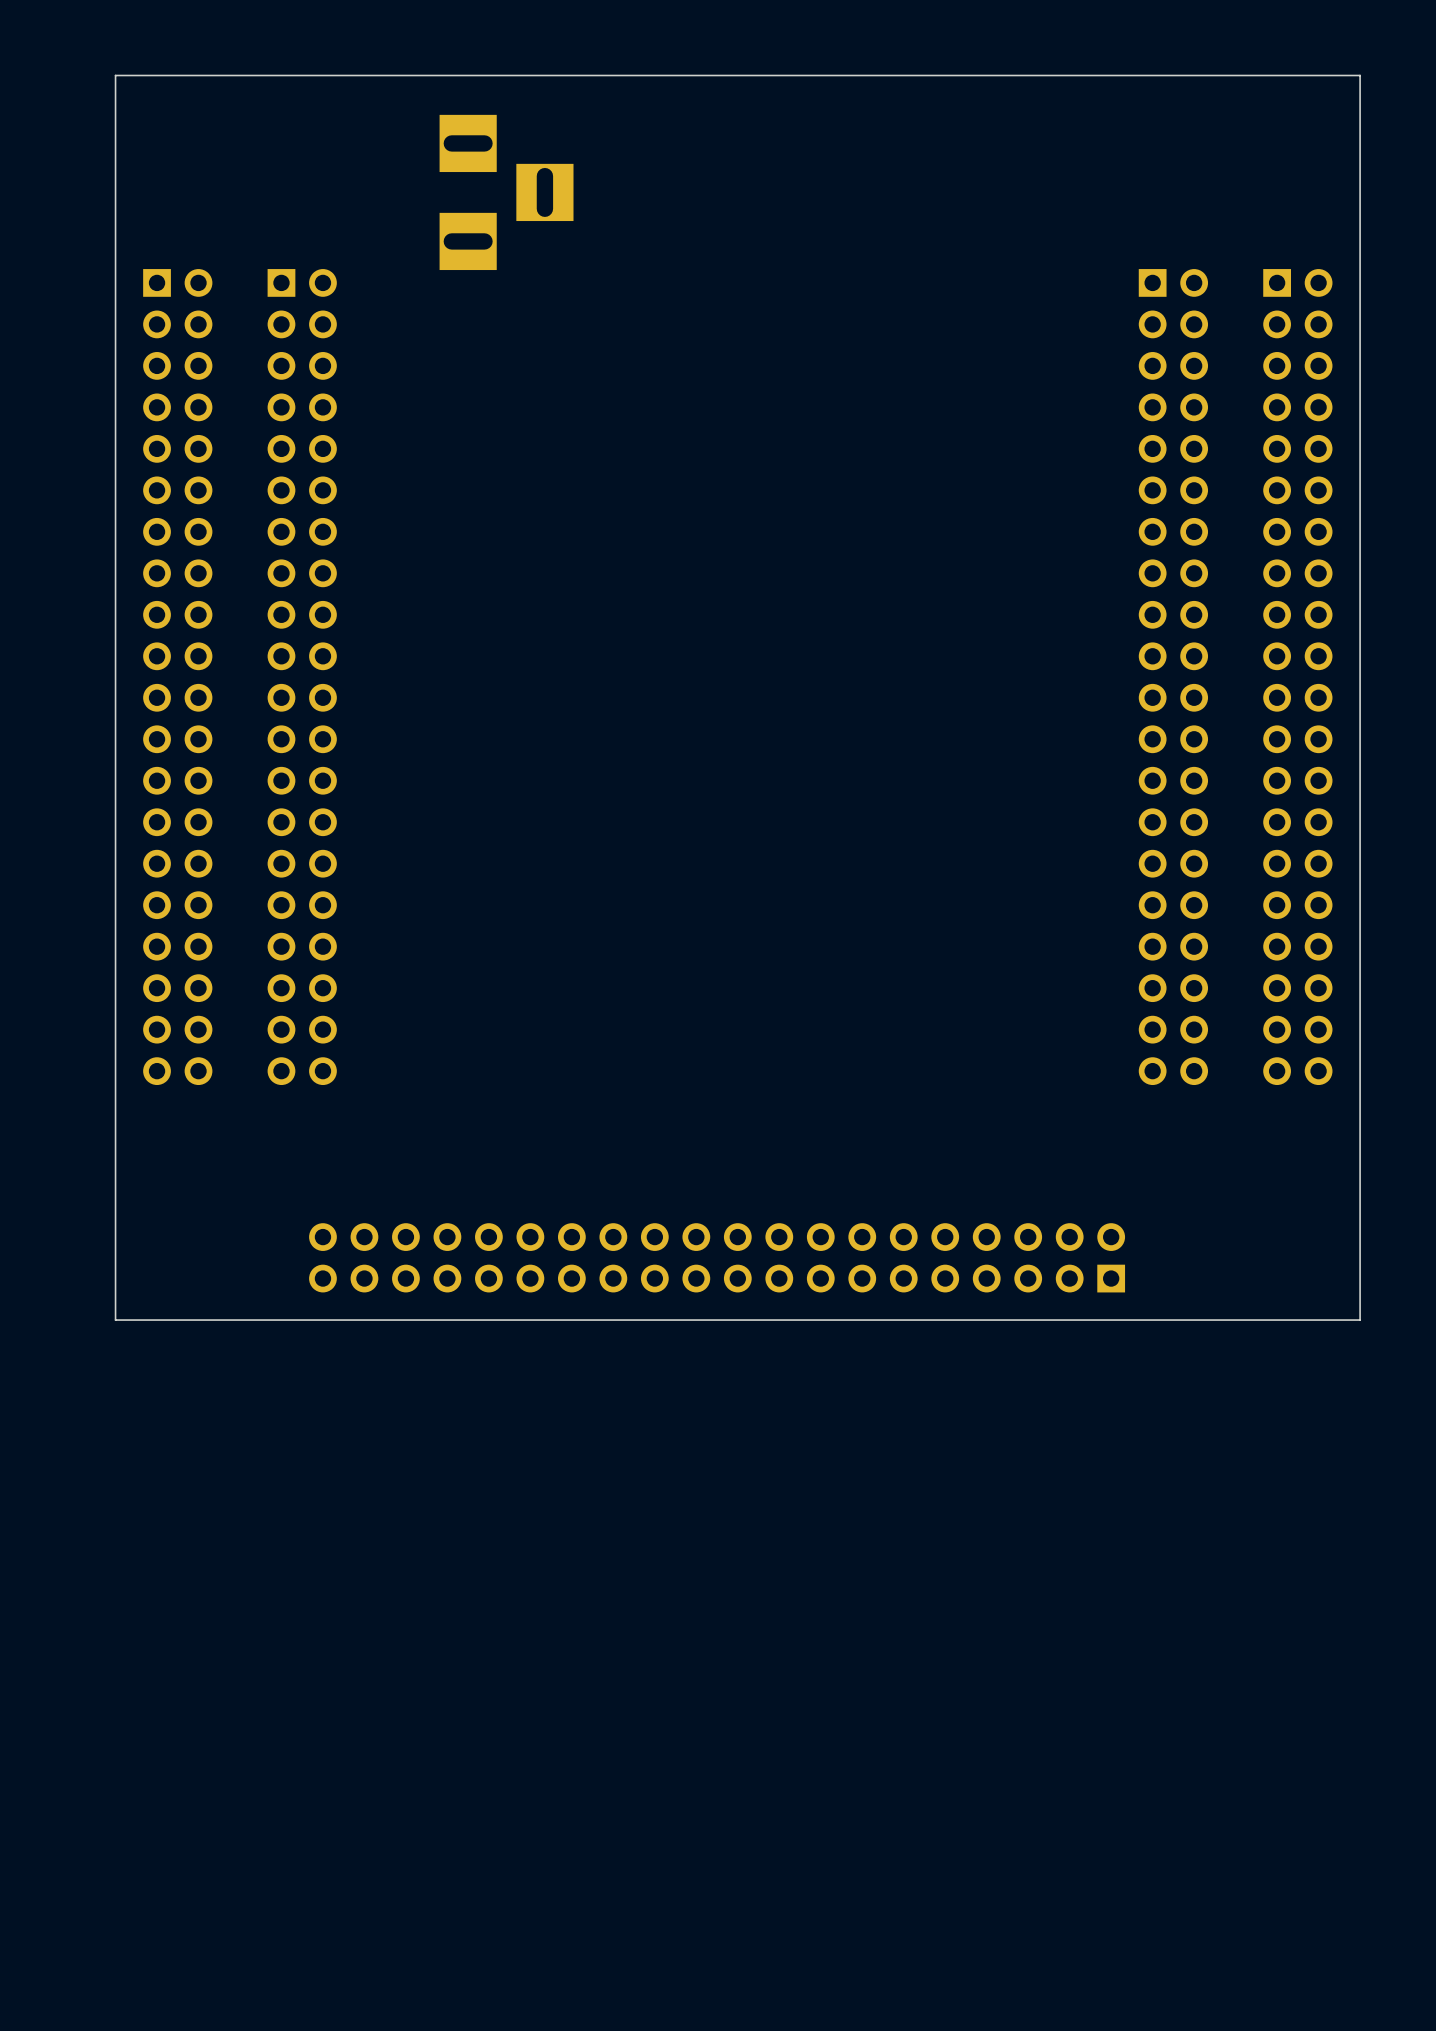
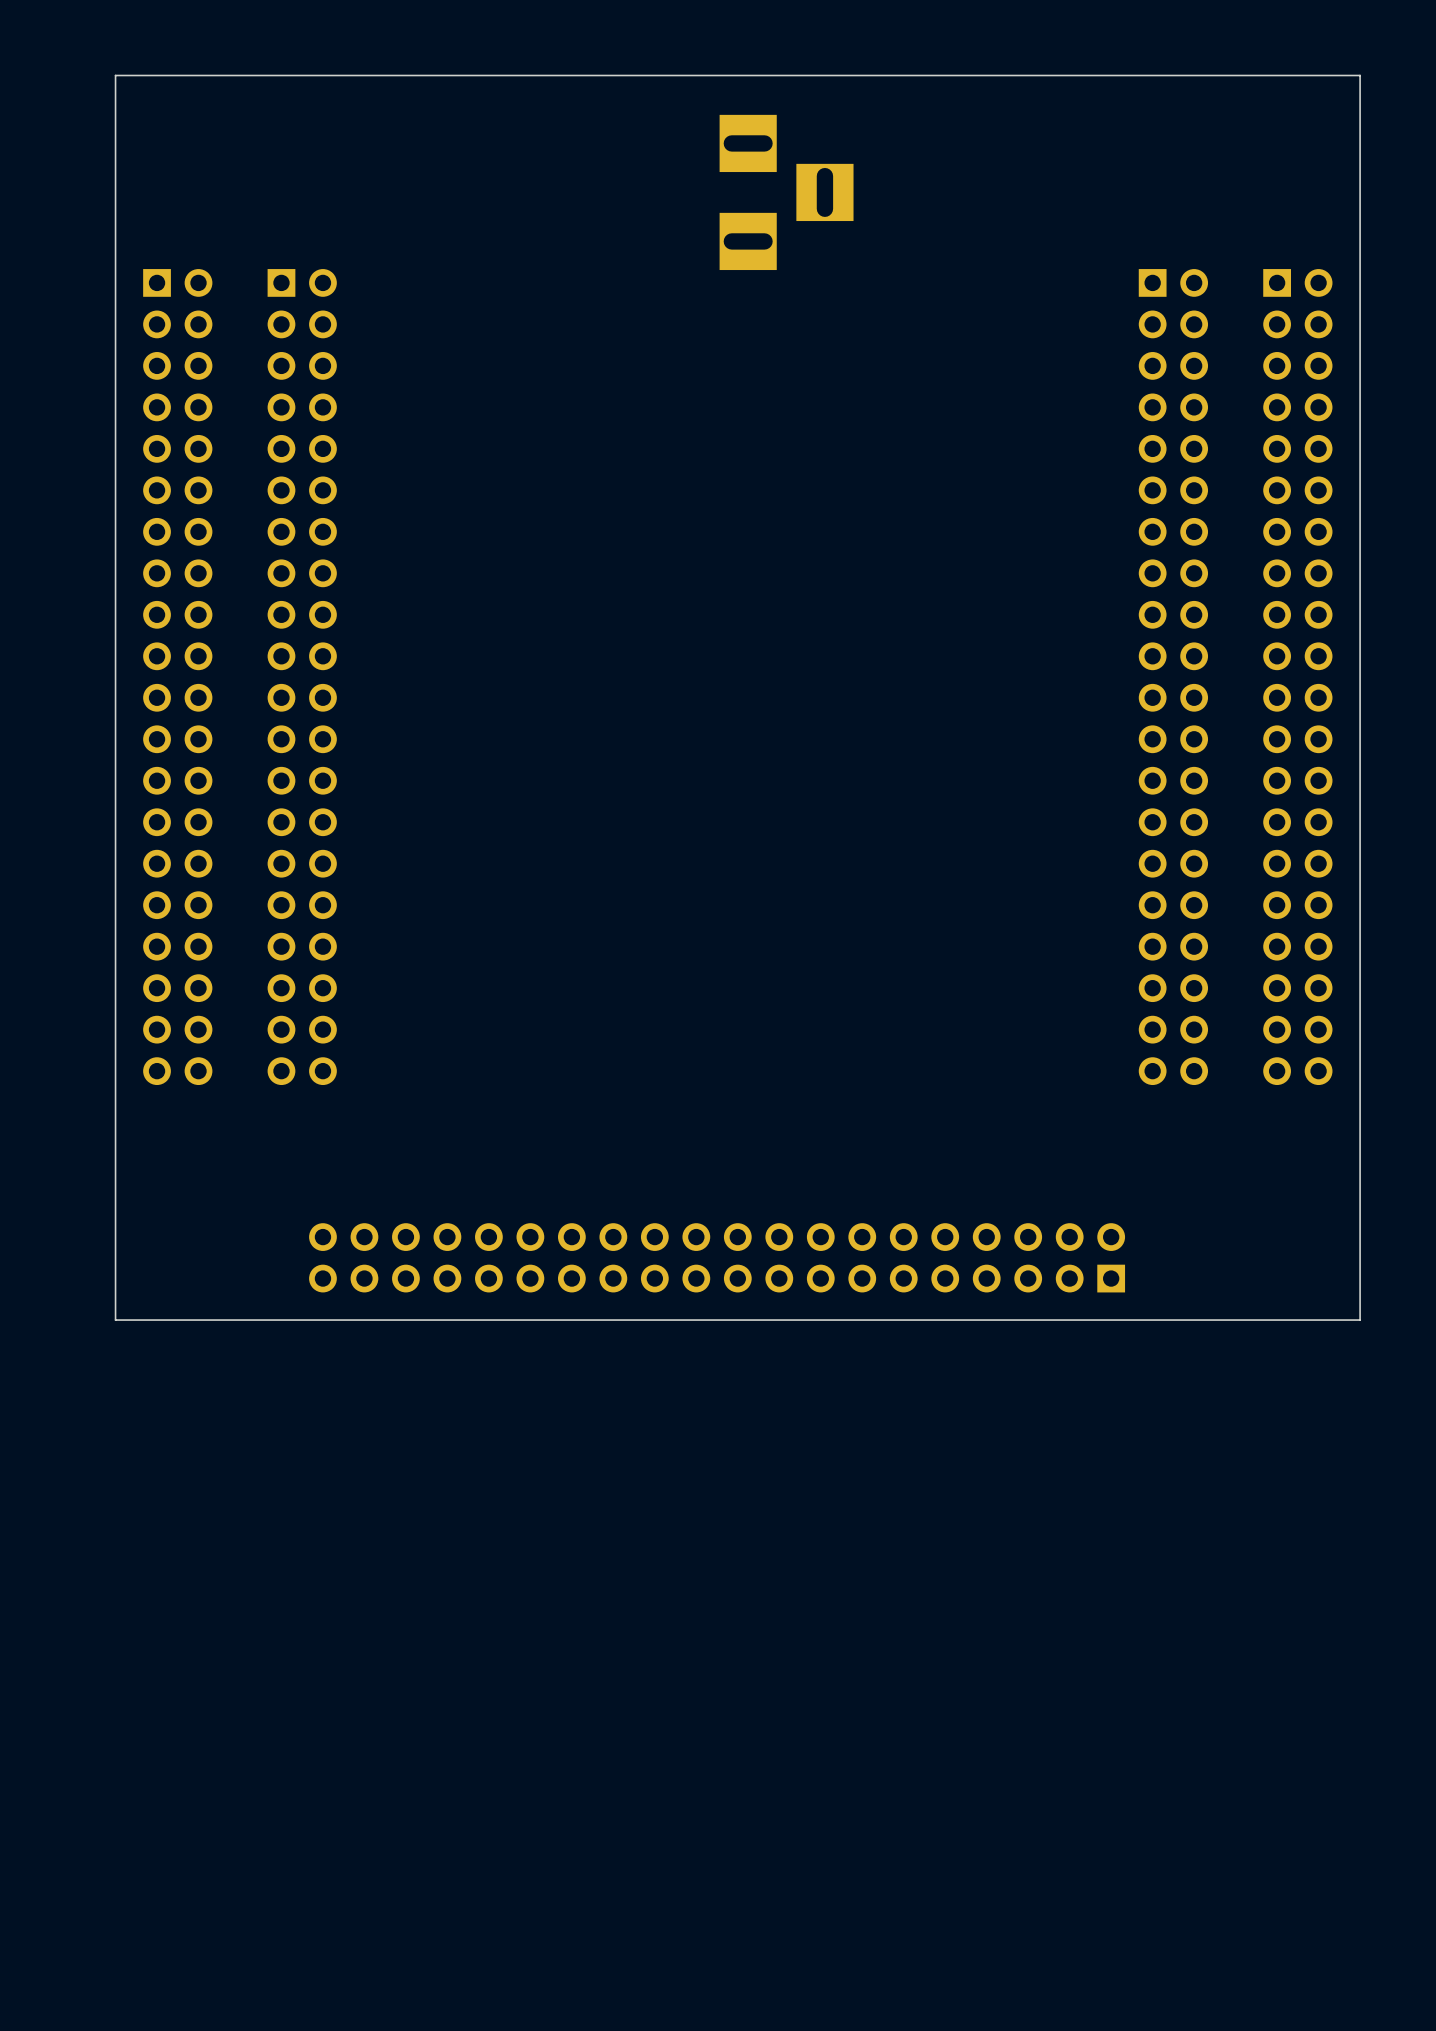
part position: (506, 192) -> (786, 192)

